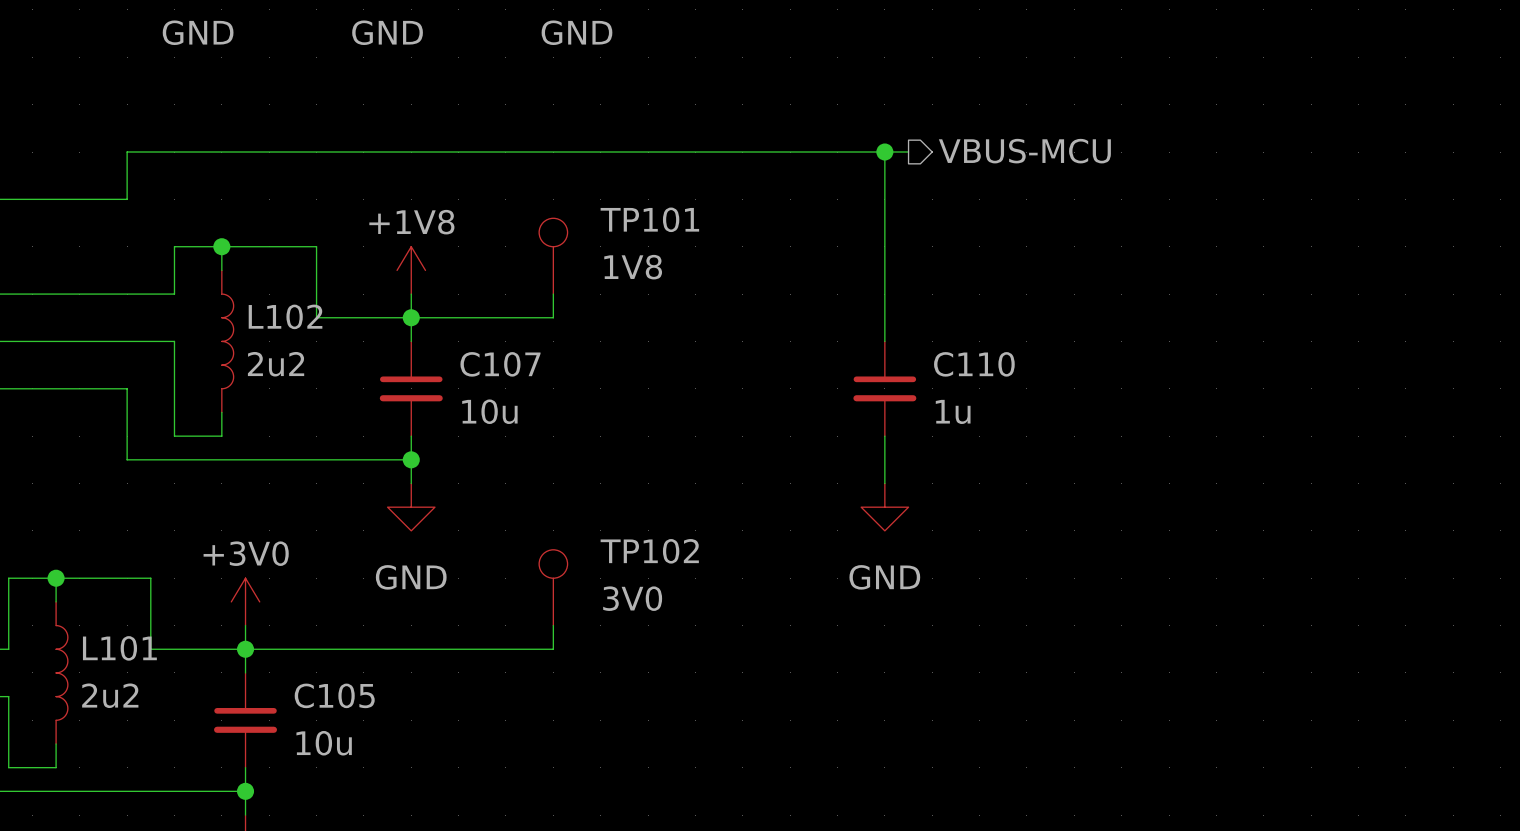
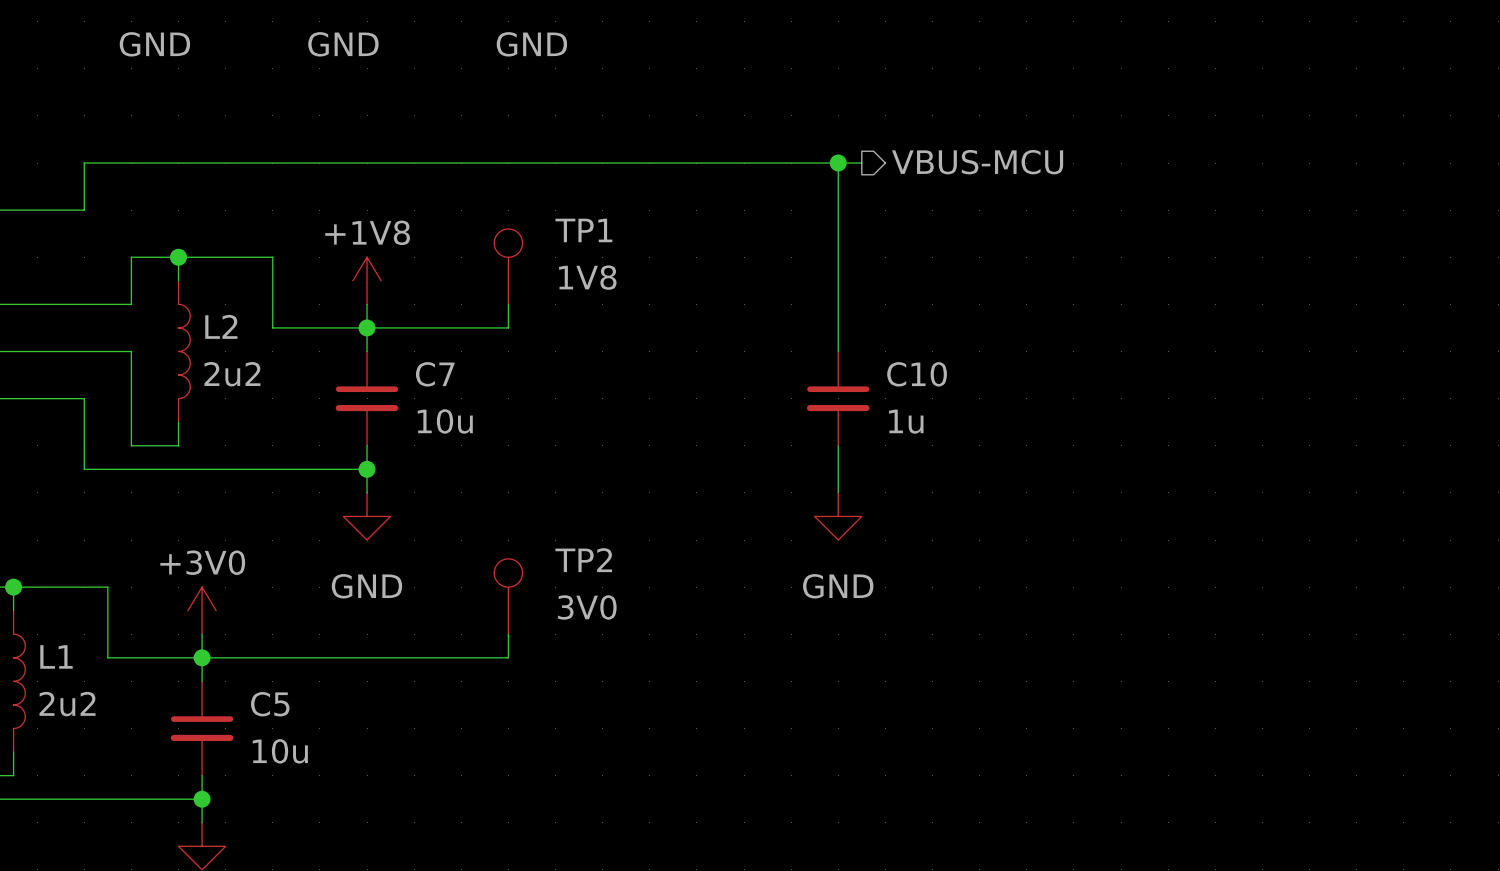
TP101 name: TP101 (649, 219) -> TP1 (583, 230)
L102 name: L102 (285, 316) -> L2 (221, 326)
C107 name: C107 (500, 364) -> C7 (435, 374)
C110 name: C110 (974, 364) -> C10 (917, 374)
TP102 name: TP102 (649, 551) -> TP2 (583, 560)
L101 name: L101 (119, 648) -> L1 (56, 656)
C105 name: C105 (334, 695) -> C5 (270, 704)

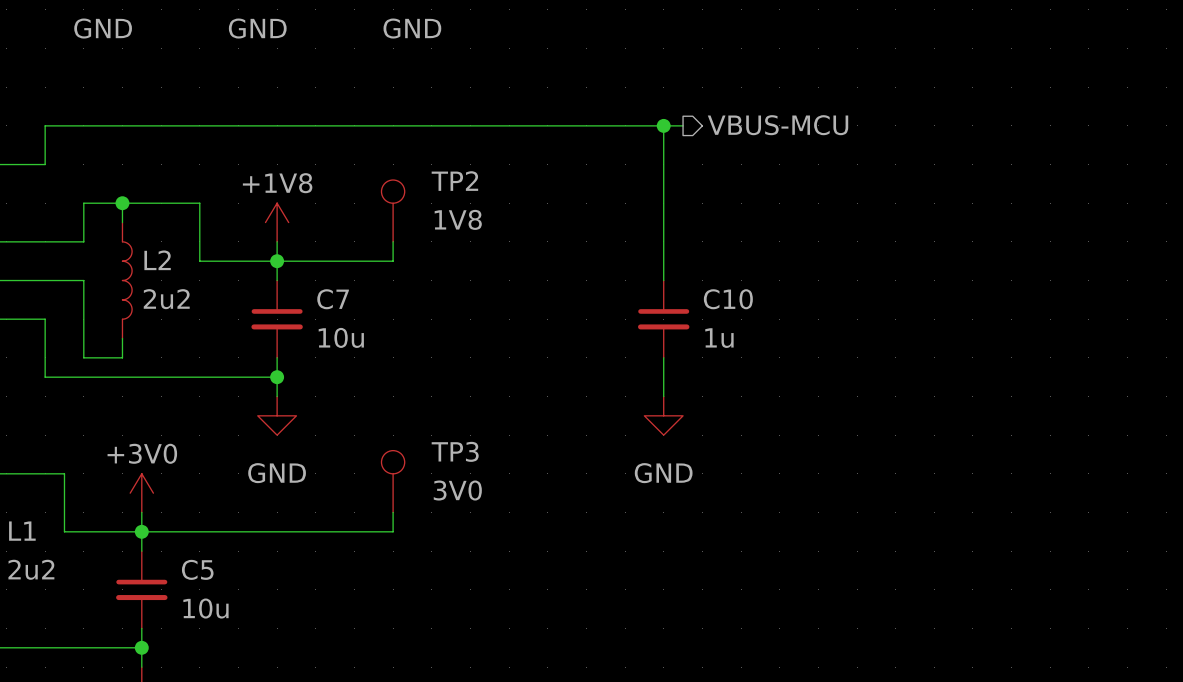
TP1 name: TP1 (583, 230) -> TP2 (454, 181)
TP2 name: TP2 (583, 560) -> TP3 (455, 451)

